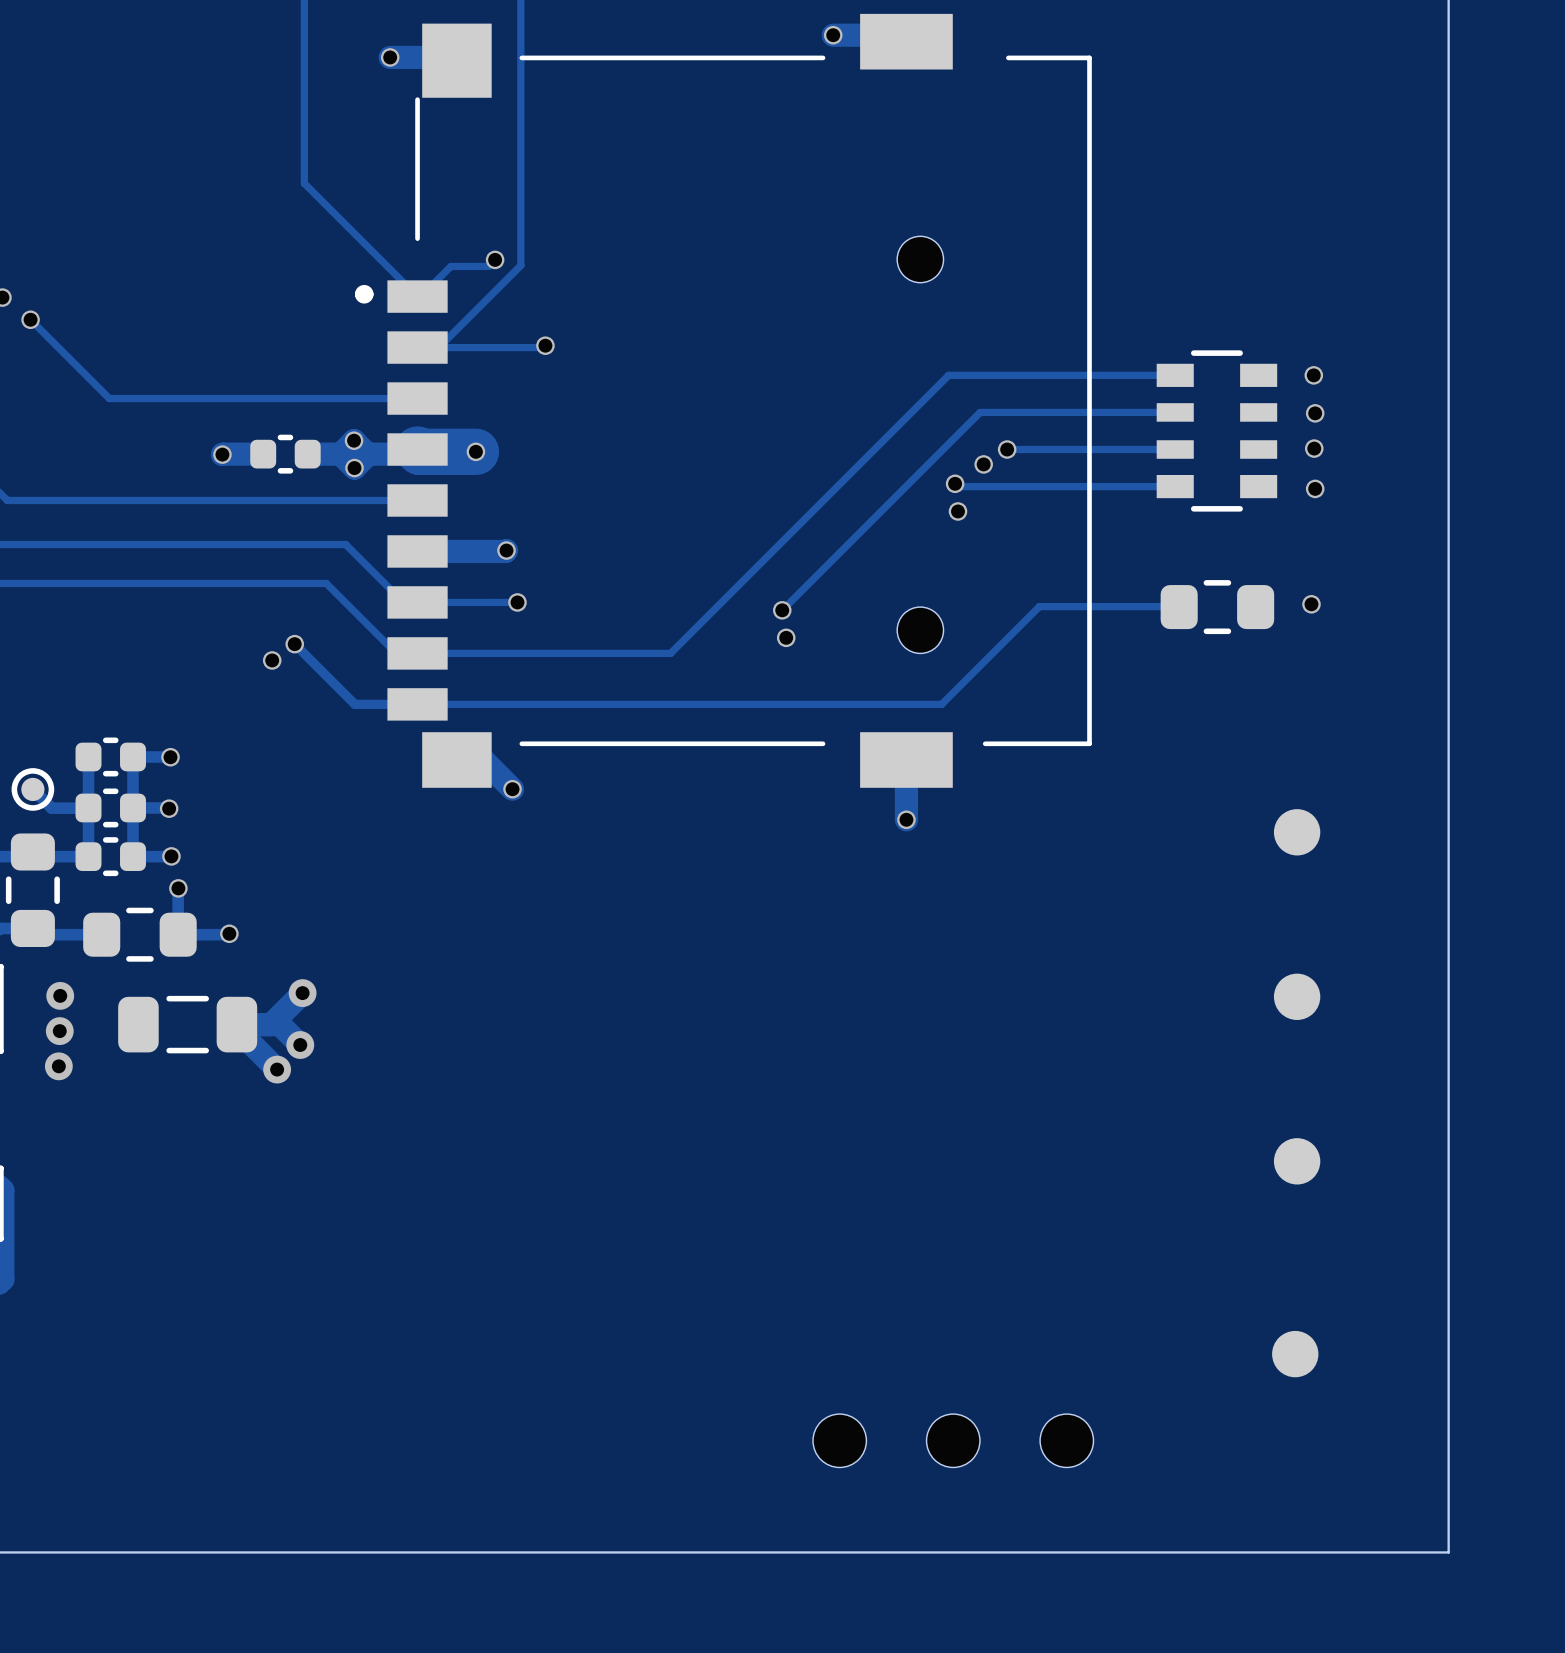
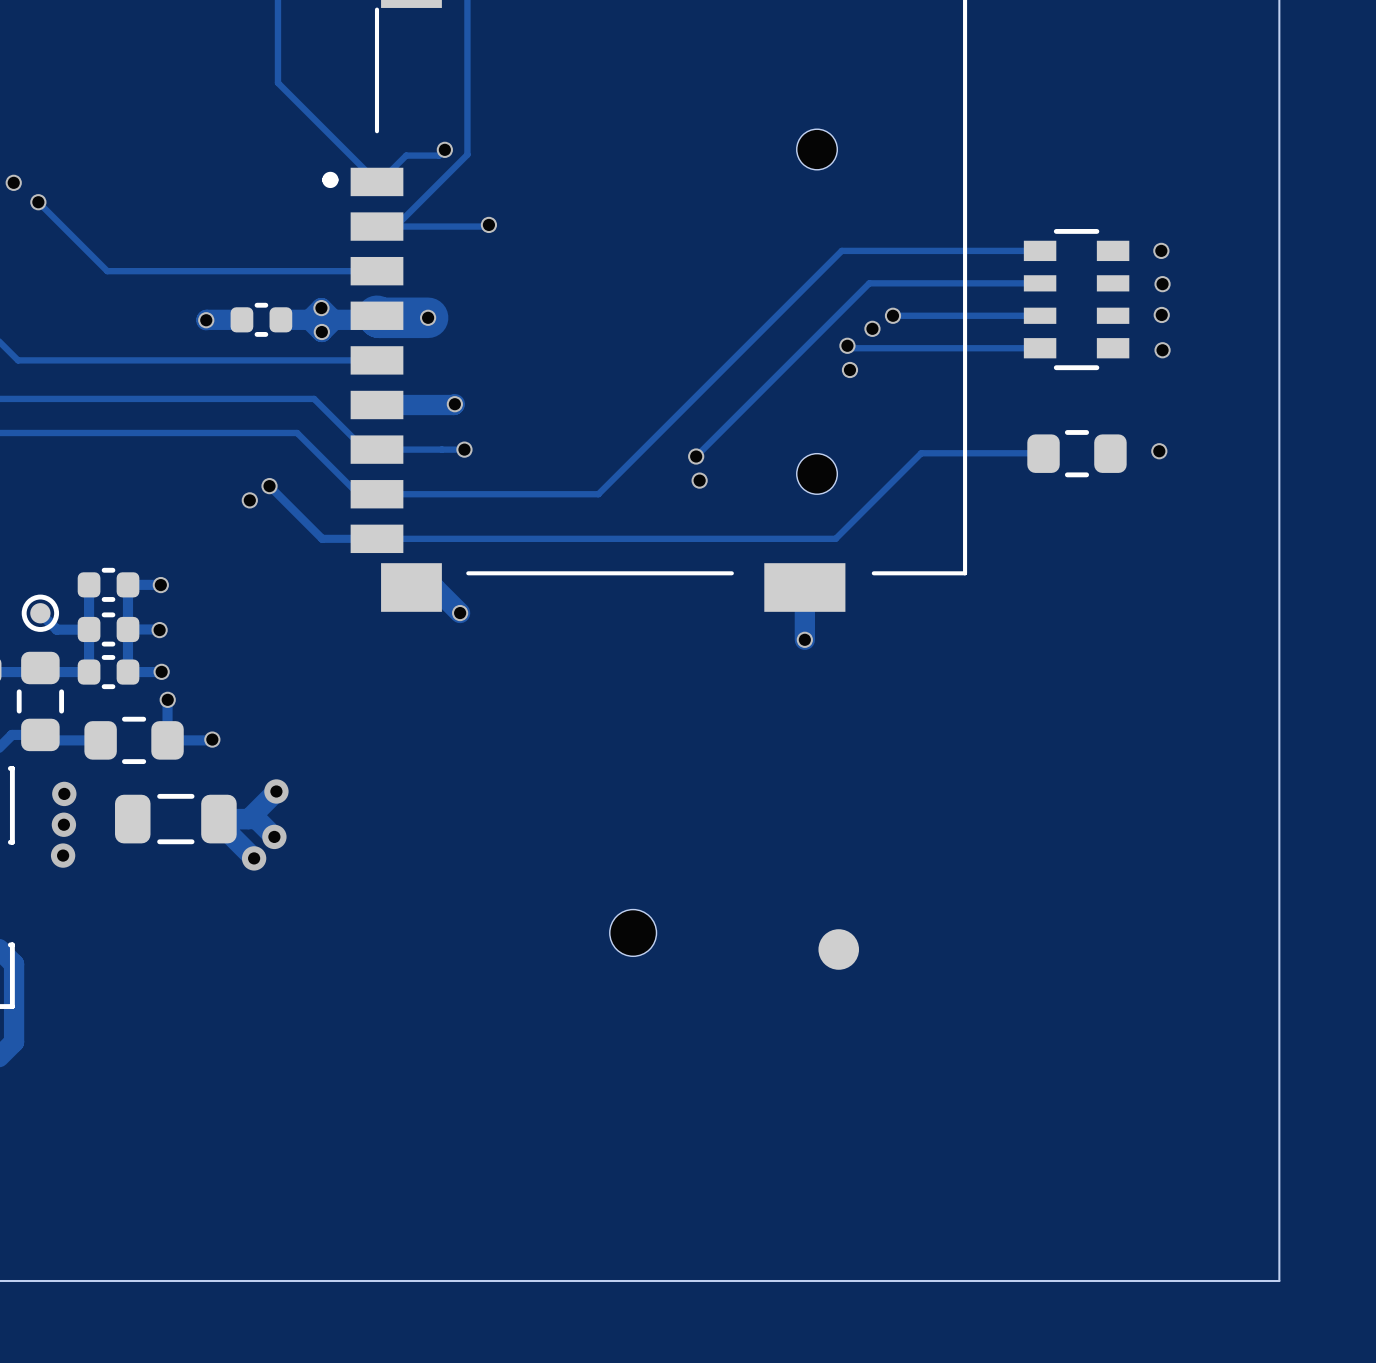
part: (1297, 832) -> none
part: (1297, 996) -> none
part: none -> (633, 932)
part: (1297, 1161) -> none
part: none -> (838, 949)
part: (1295, 1354) -> none
part: (839, 1440) -> none
part: (953, 1440) -> none
part: (1066, 1440) -> none

